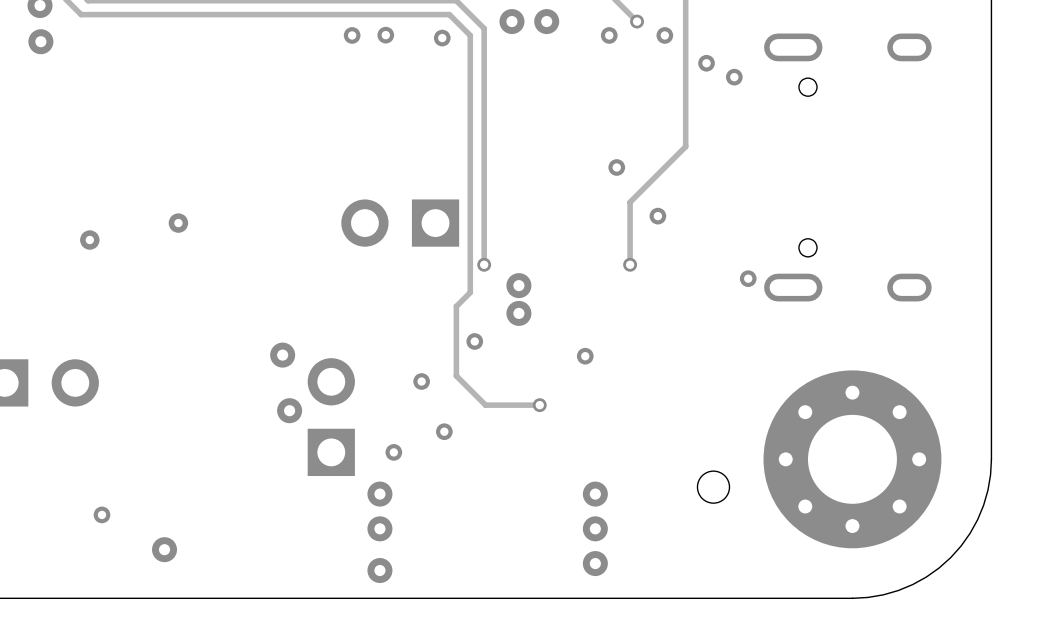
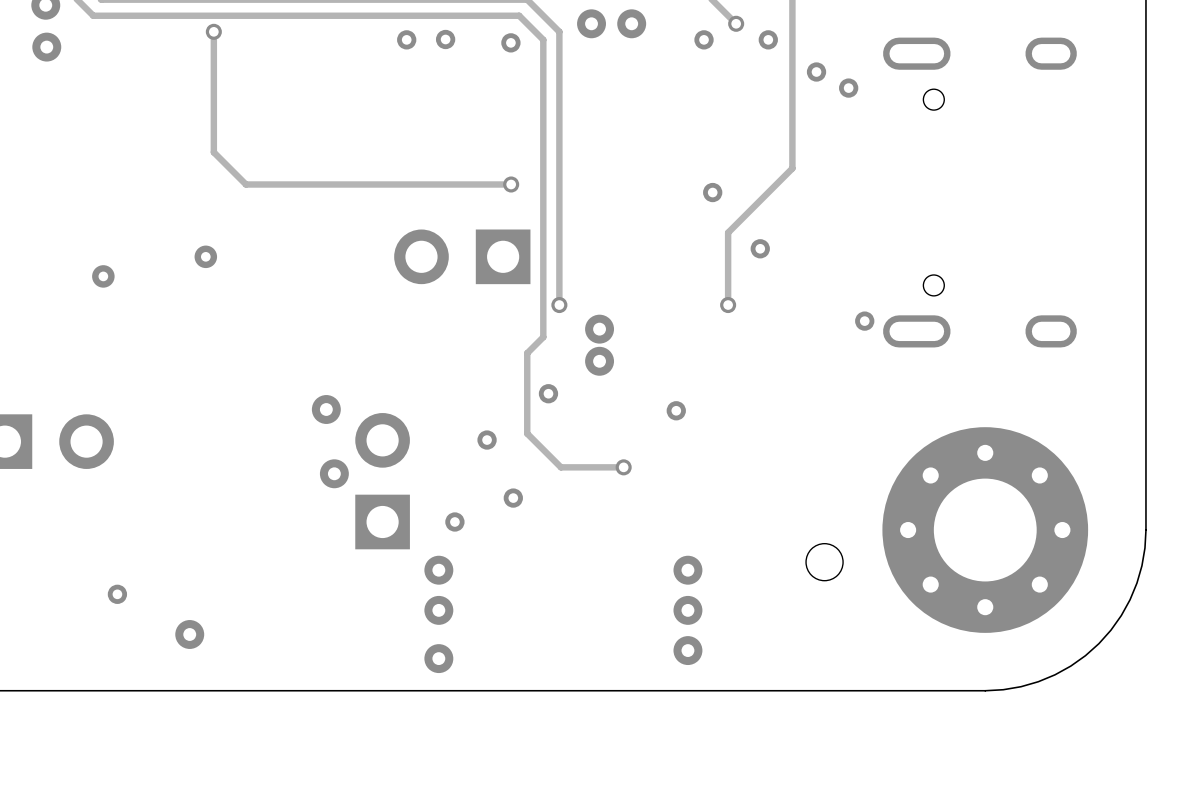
track: none -> (213, 31) (213, 152) (245, 184) (511, 184)
via: none -> (213, 31)
via: none -> (511, 184)

